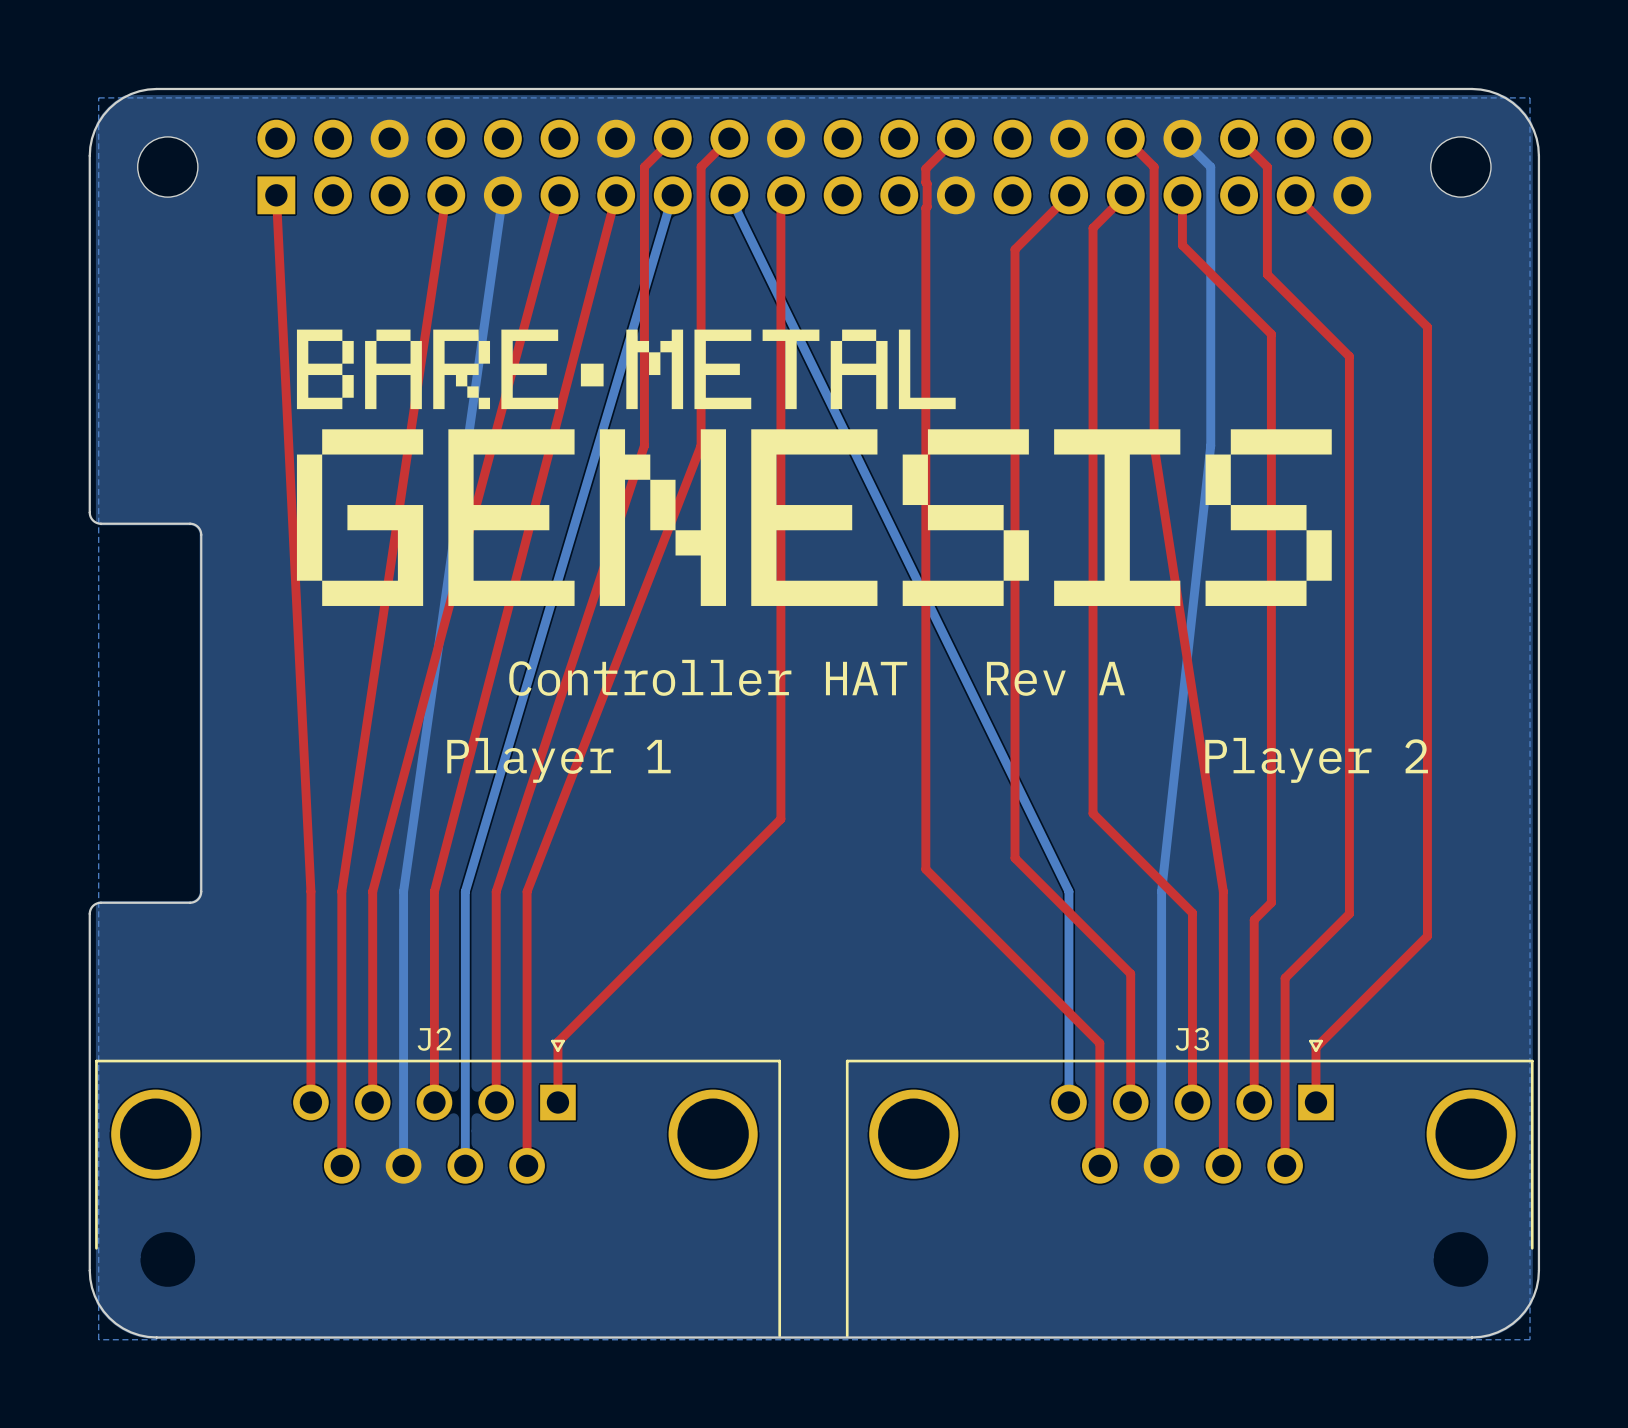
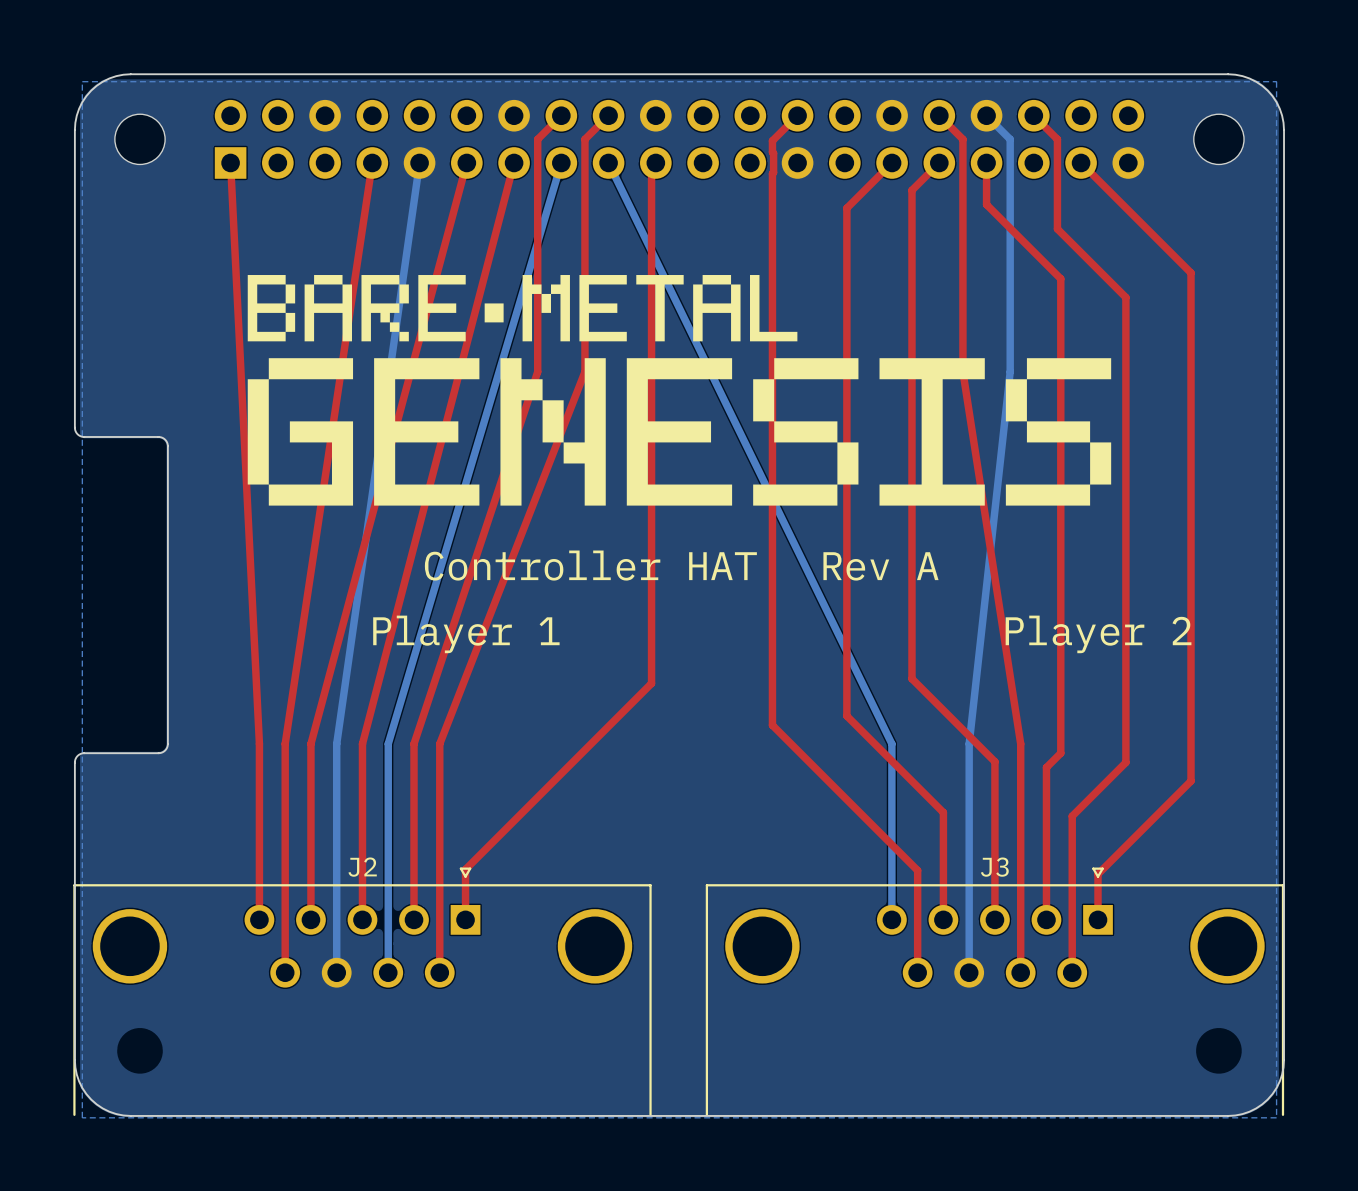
J2 footprint: [95, 1039, 782, 1338] -> [73, 867, 652, 1116]
J3 footprint: [845, 1039, 1534, 1338] -> [705, 867, 1285, 1116]

